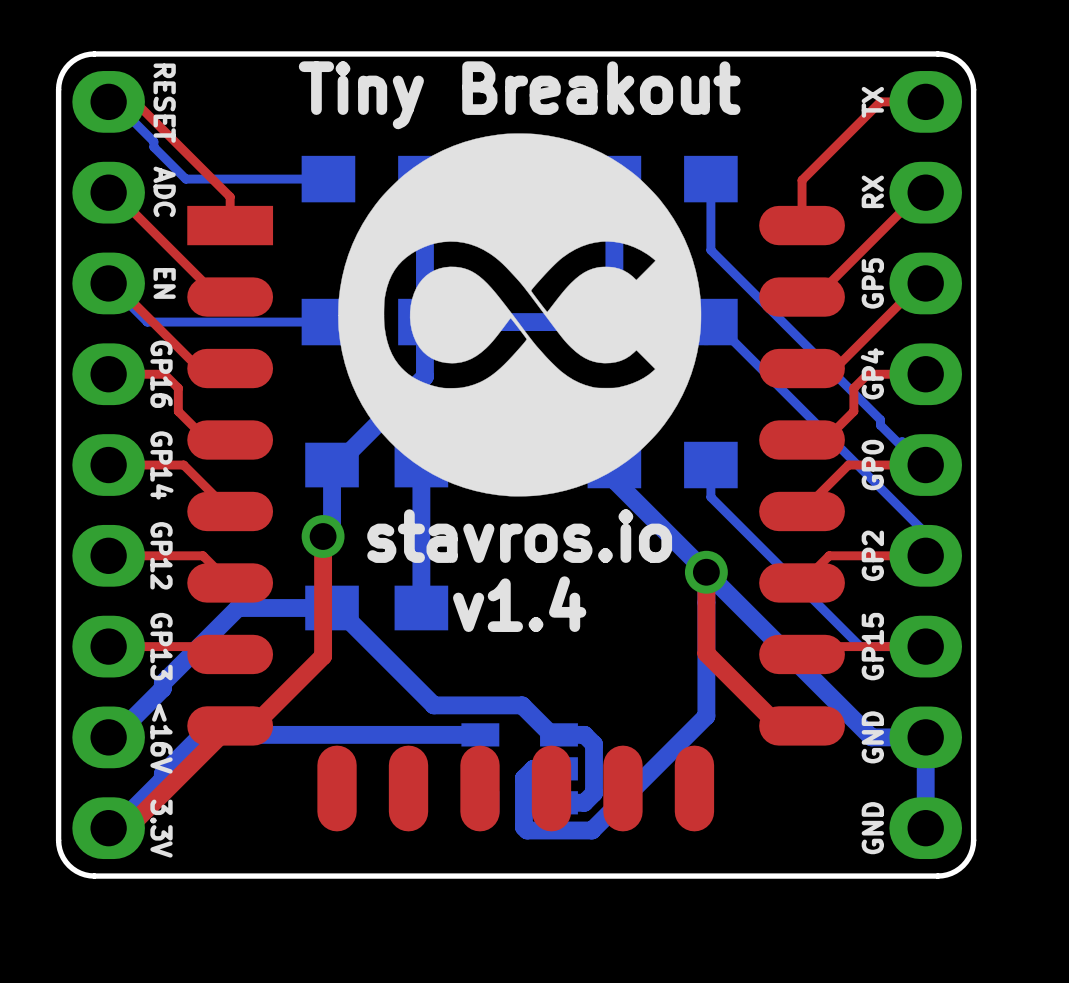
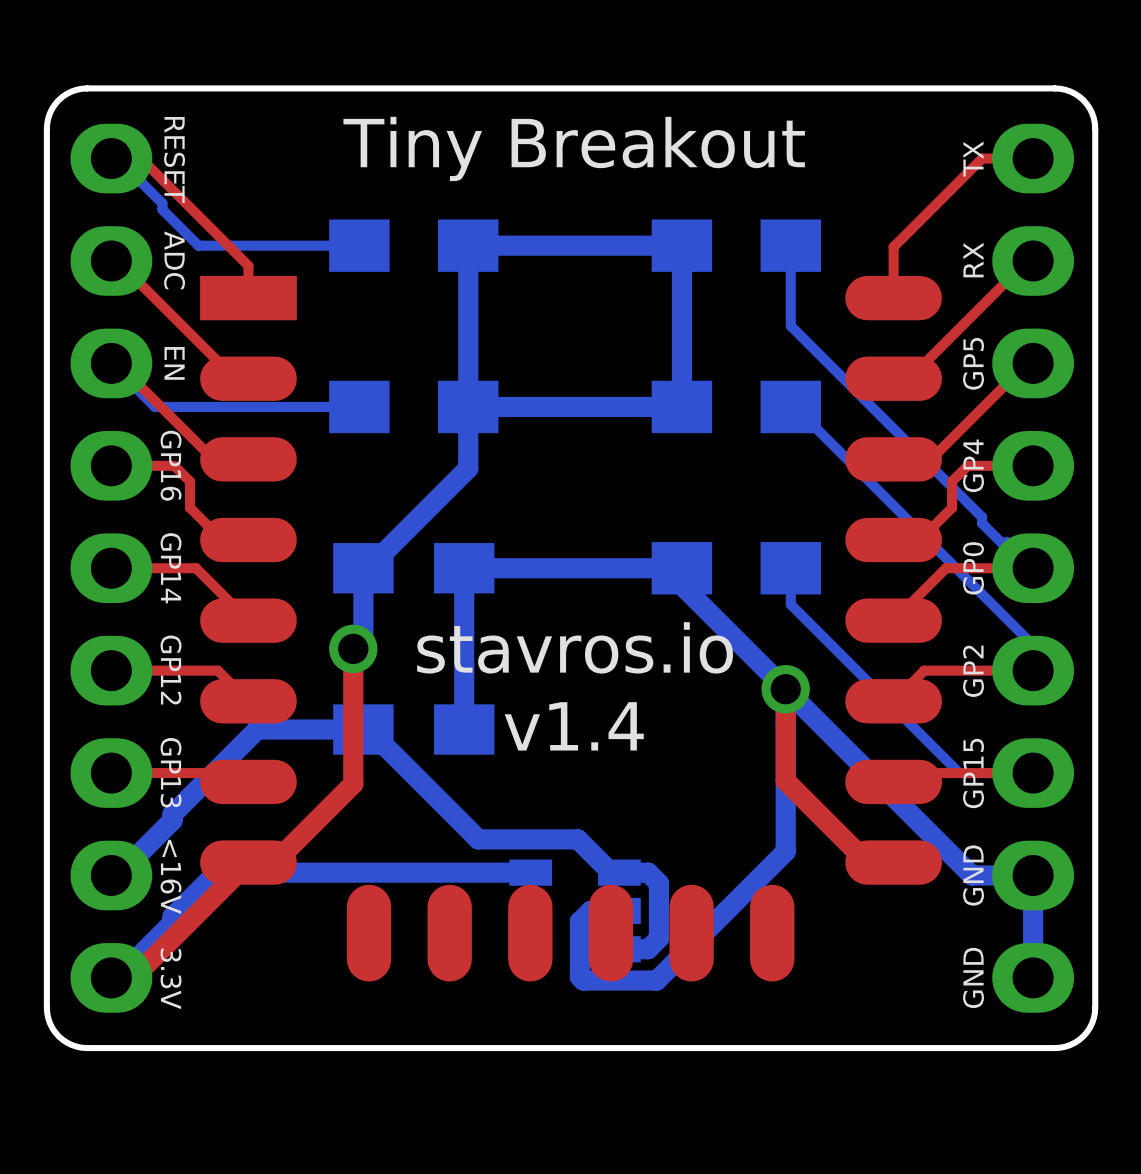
board edge: (94, 53) (937, 53) (951, 56) (963, 64) (970, 76) (973, 89) (973, 840) (970, 854) (963, 865) (951, 873) (937, 876) (94, 876) (80, 873) (69, 865) (61, 854) (58, 840) (58, 89) (61, 76) (69, 64) (80, 56) (94, 53) -> (87, 88) (71, 91) (58, 100) (49, 113) (46, 128) (46, 1007) (49, 1023) (58, 1036) (71, 1045) (87, 1048) (1054, 1048) (1070, 1045) (1083, 1036) (1092, 1023) (1095, 1007) (1095, 128) (1092, 113) (1083, 100) (1070, 91) (1054, 88) (87, 88)
drawing: [338, 133, 702, 497] -> none

